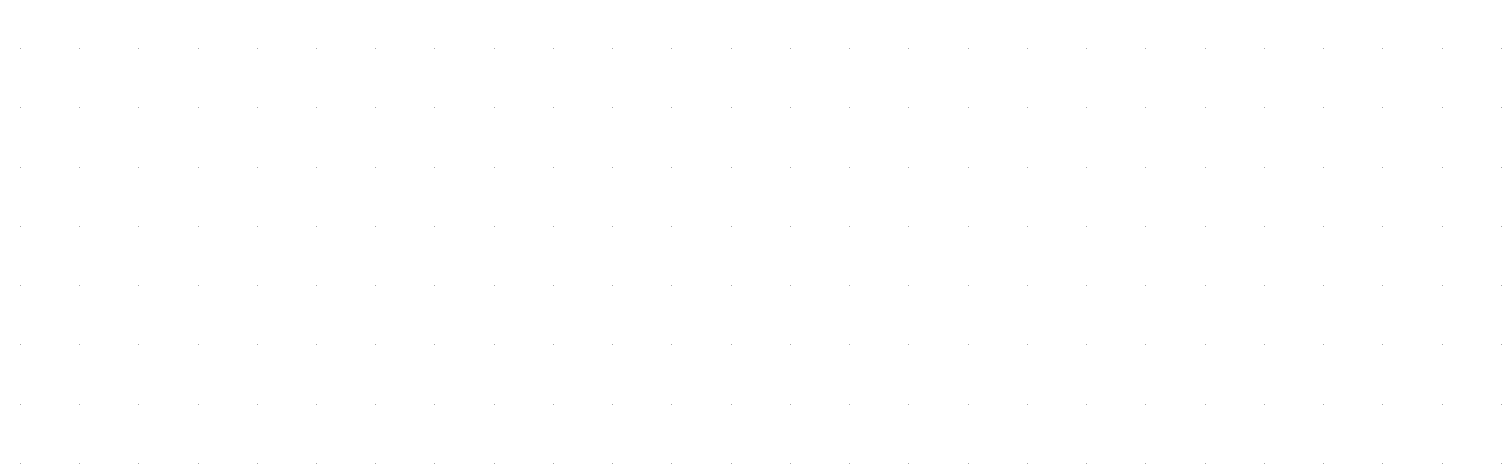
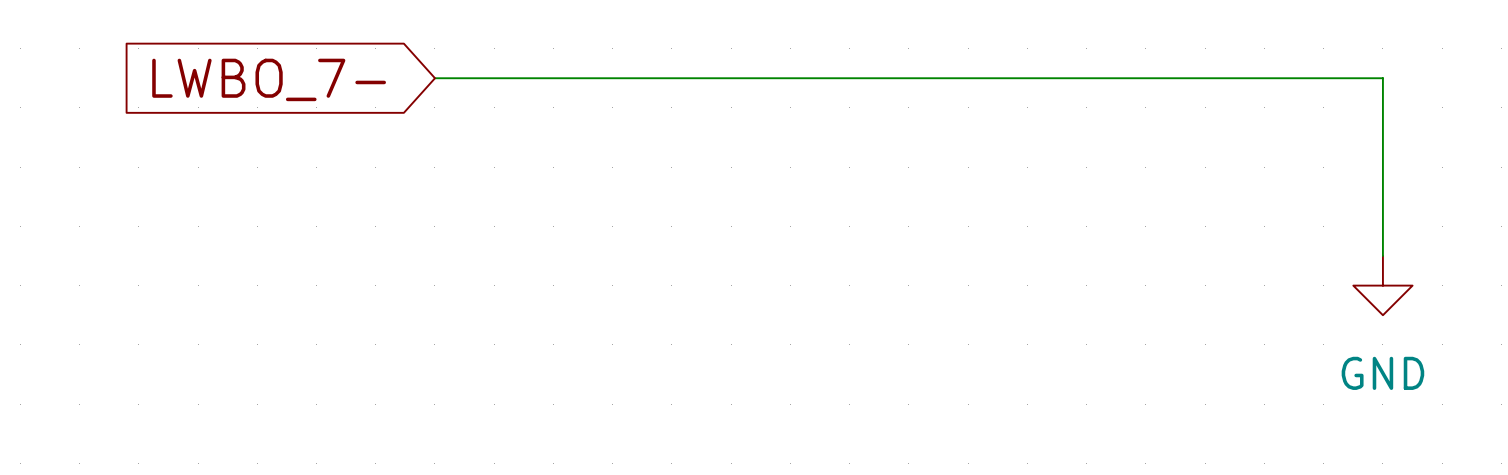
wire: none -> (434, 78) (1382, 78) (1382, 255)
global label: none -> LWBO_7- (269, 79)
power symbol: none -> GND (1382, 285)

